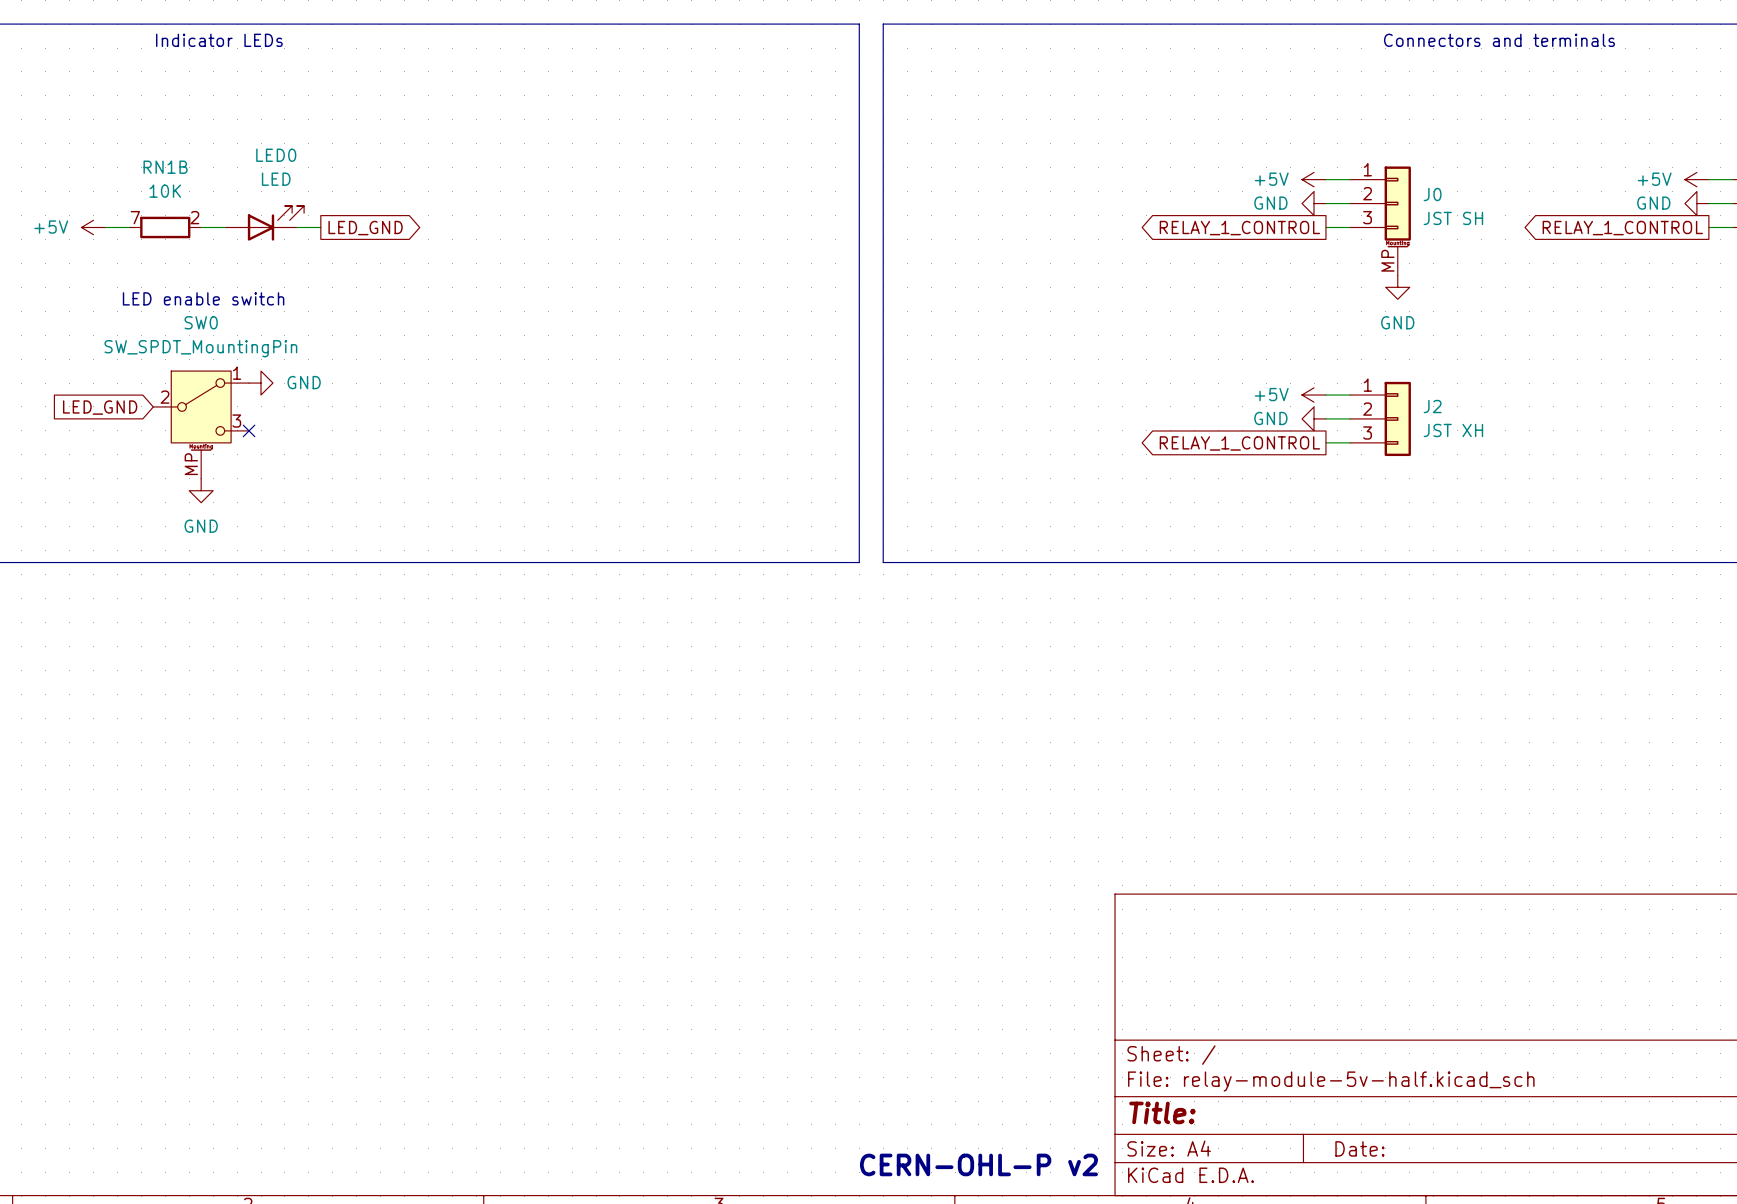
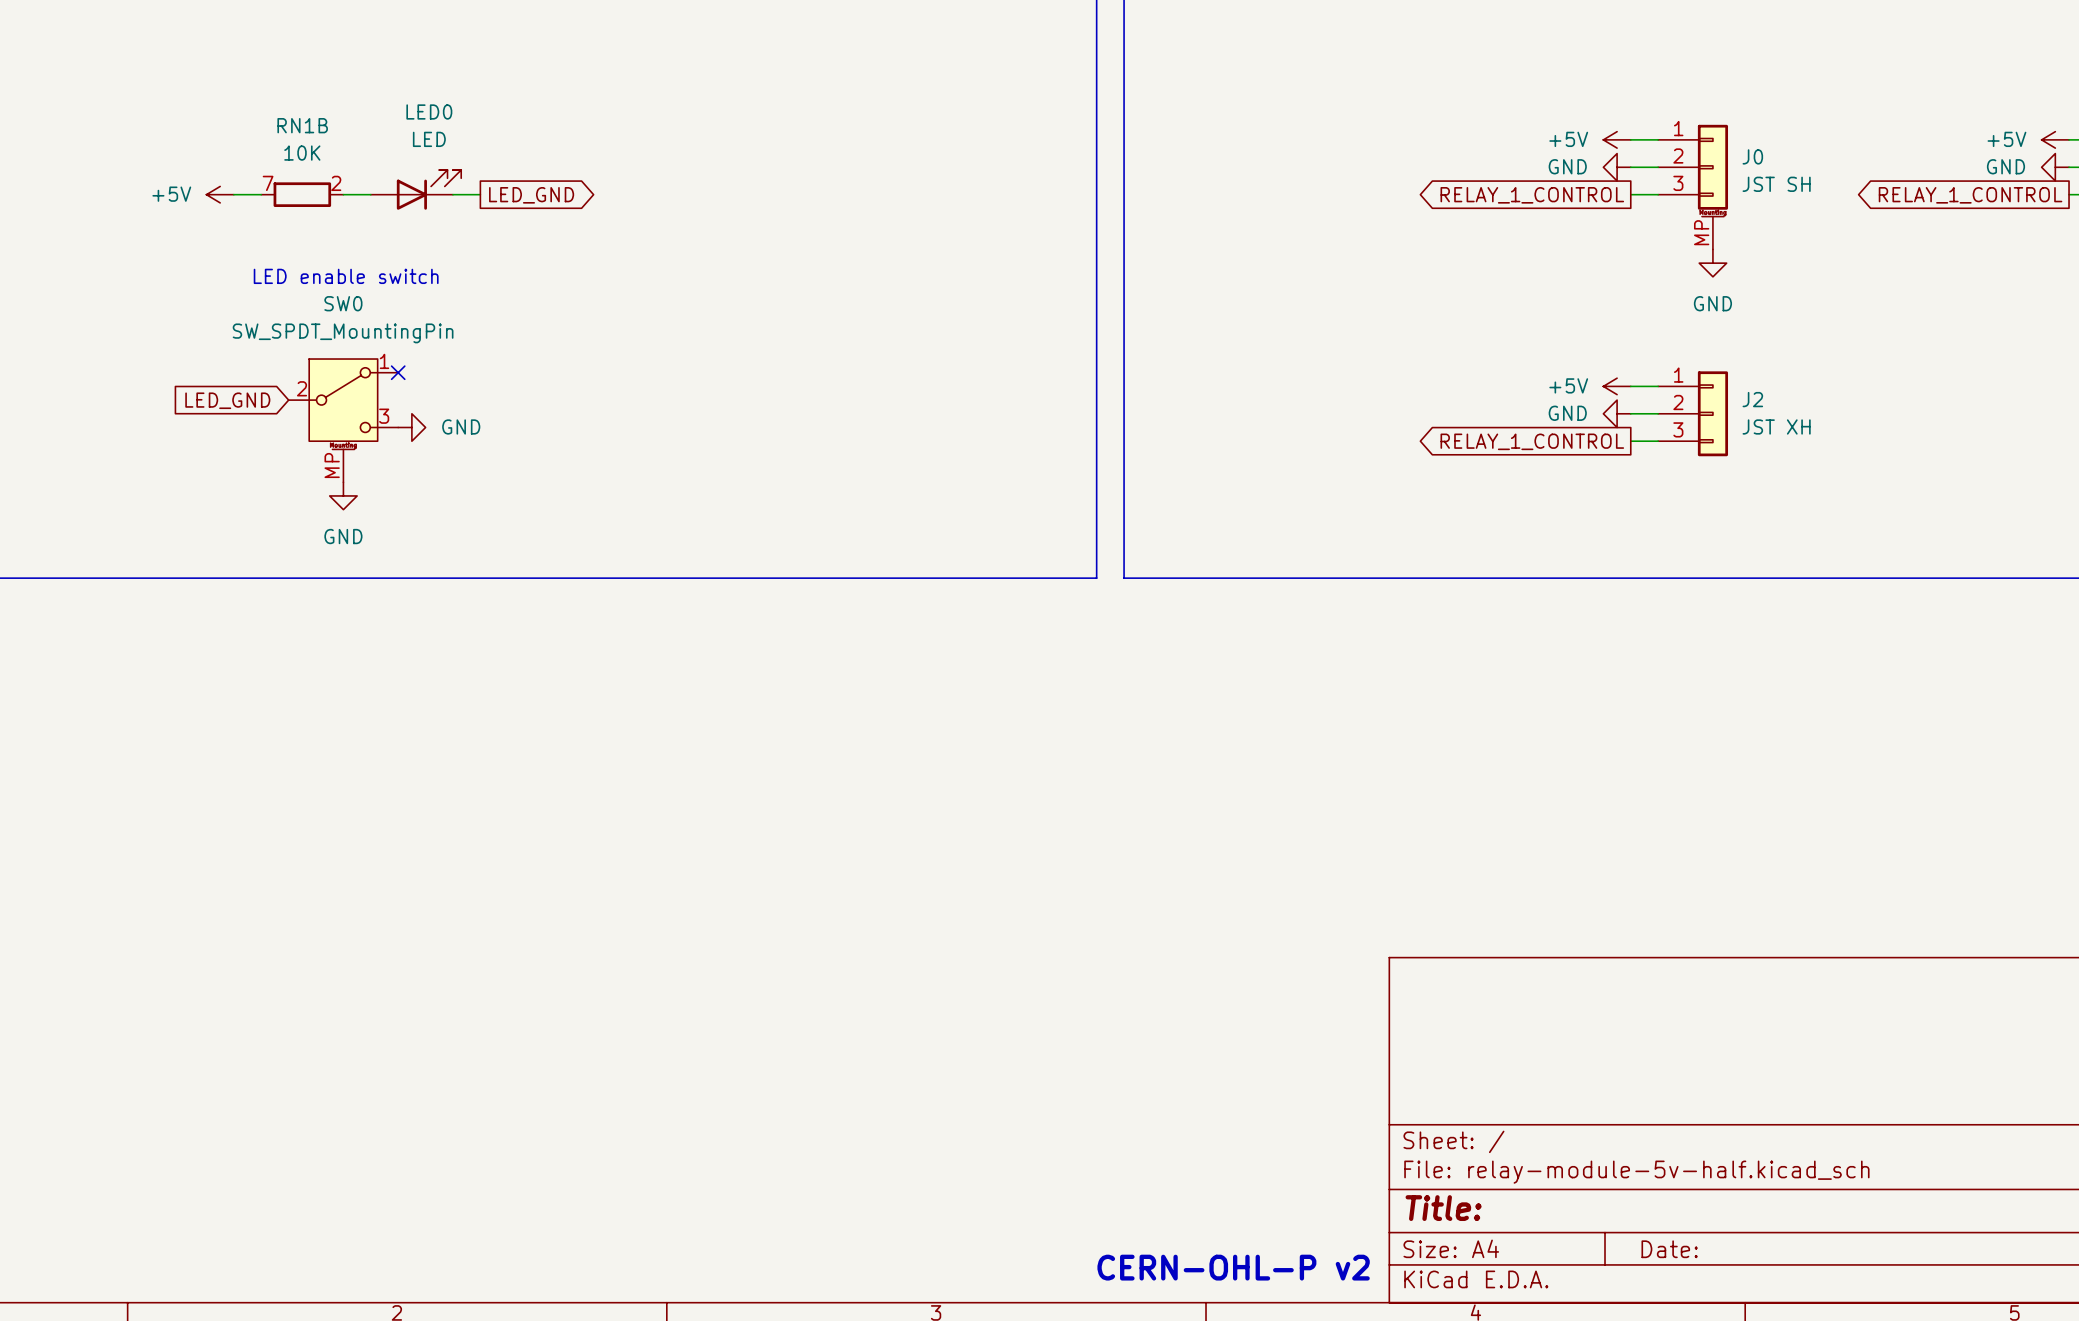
power symbol position: GND (261, 383) -> GND (411, 427)
no-connect mark position: (249, 430) -> (398, 372)

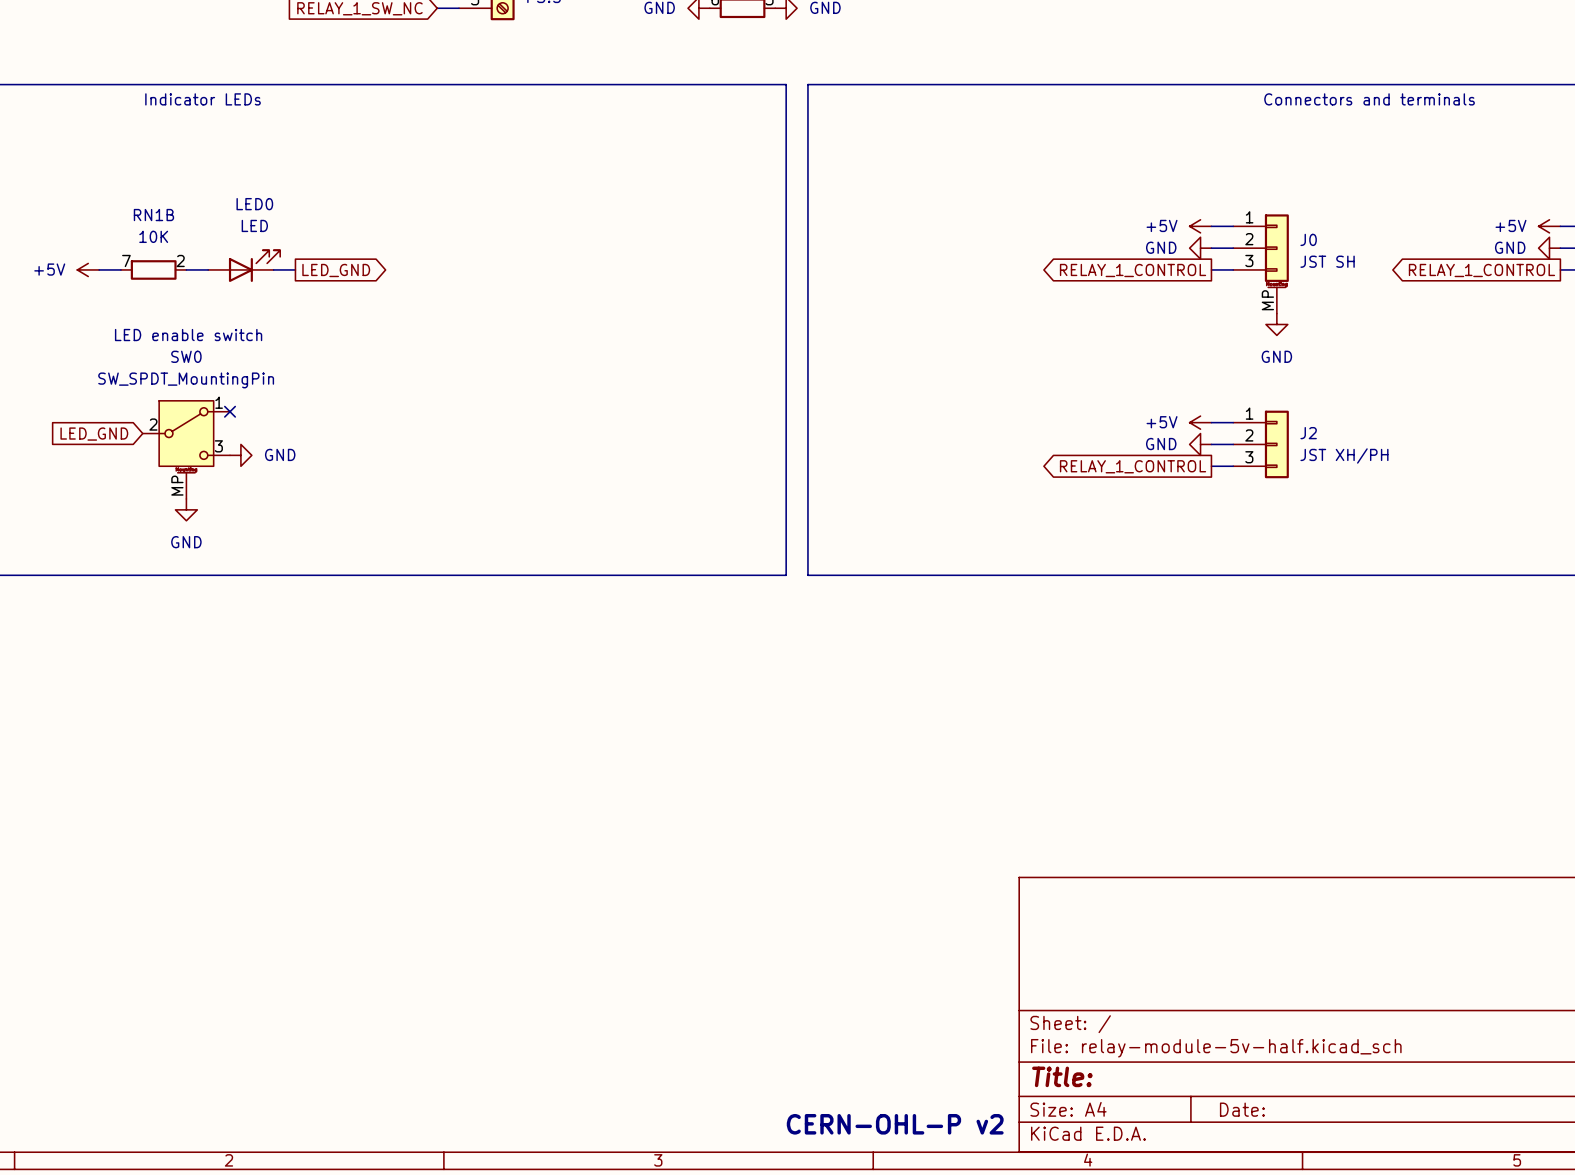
J2 value: JST XH (1776, 426) -> JST XH/PH (1344, 455)

